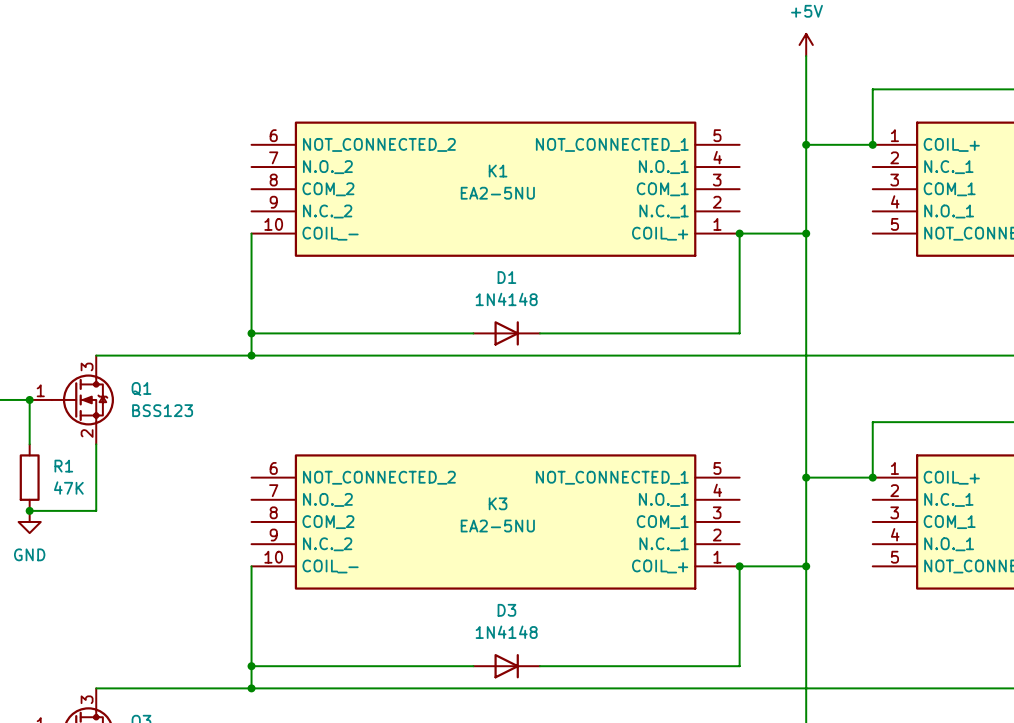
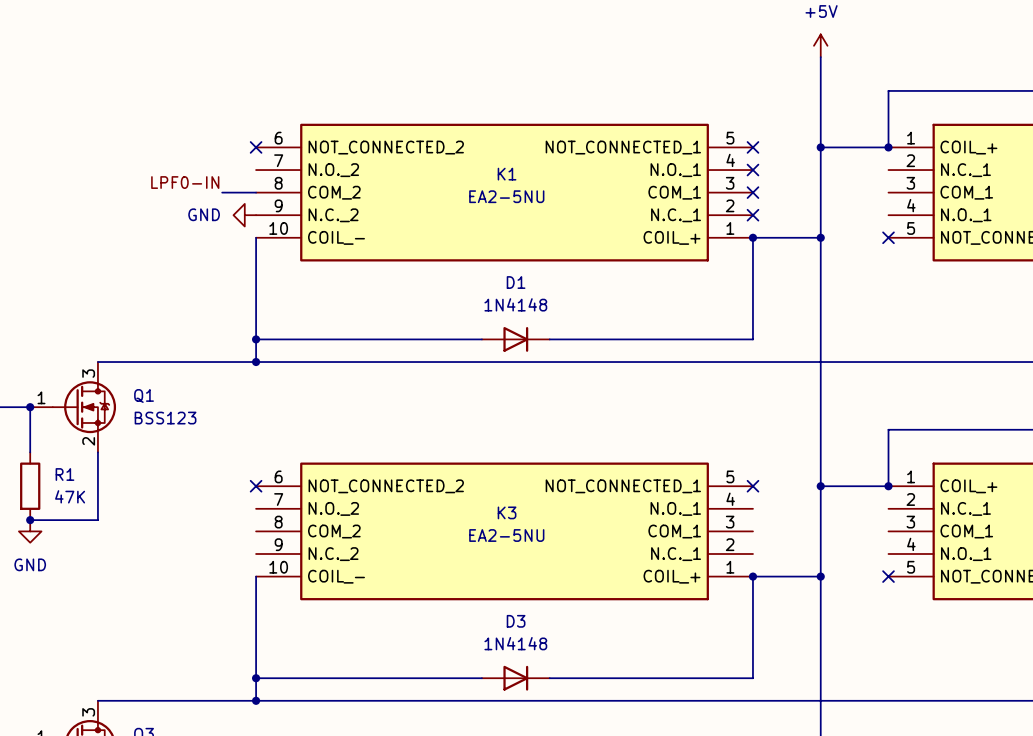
no-connect mark: none -> (256, 147)
no-connect mark: none -> (752, 147)
no-connect mark: none -> (752, 170)
label: none -> LPF0-IN (185, 182)
wire: none -> (222, 192) (256, 192)
no-connect mark: none -> (752, 192)
power symbol: none -> GND (244, 215)
no-connect mark: none -> (752, 215)
no-connect mark: none -> (888, 237)
no-connect mark: none -> (256, 486)
no-connect mark: none -> (752, 486)
no-connect mark: none -> (888, 576)

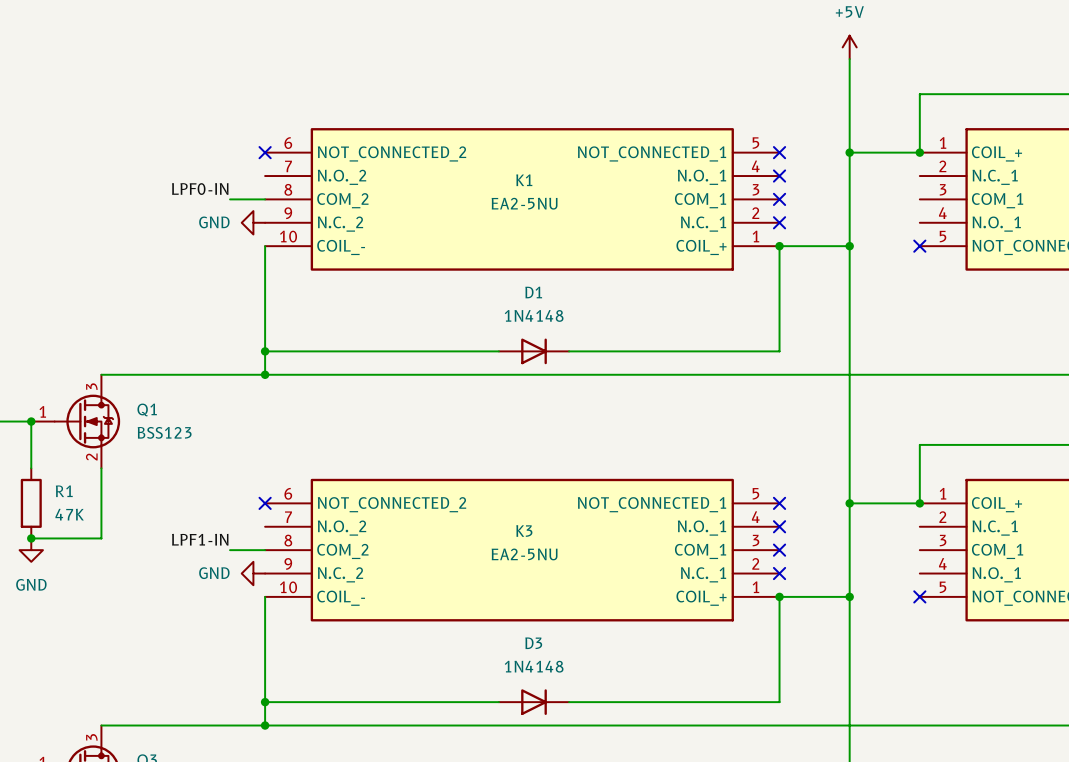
no-connect mark: none -> (779, 526)
label: none -> LPF1-IN (200, 539)
wire: none -> (230, 550) (265, 550)
no-connect mark: none -> (779, 550)
power symbol: none -> GND (253, 573)
no-connect mark: none -> (779, 573)

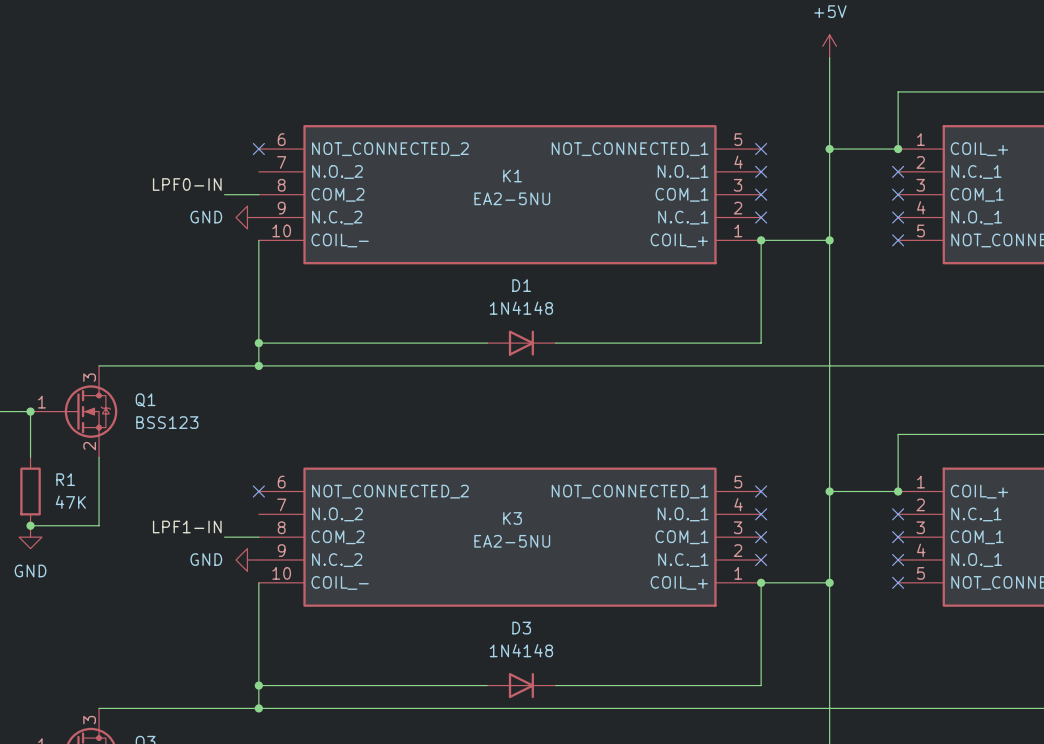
no-connect mark: none -> (898, 171)
no-connect mark: none -> (898, 194)
no-connect mark: none -> (898, 217)
no-connect mark: none -> (898, 514)
no-connect mark: none -> (898, 537)
no-connect mark: none -> (898, 559)

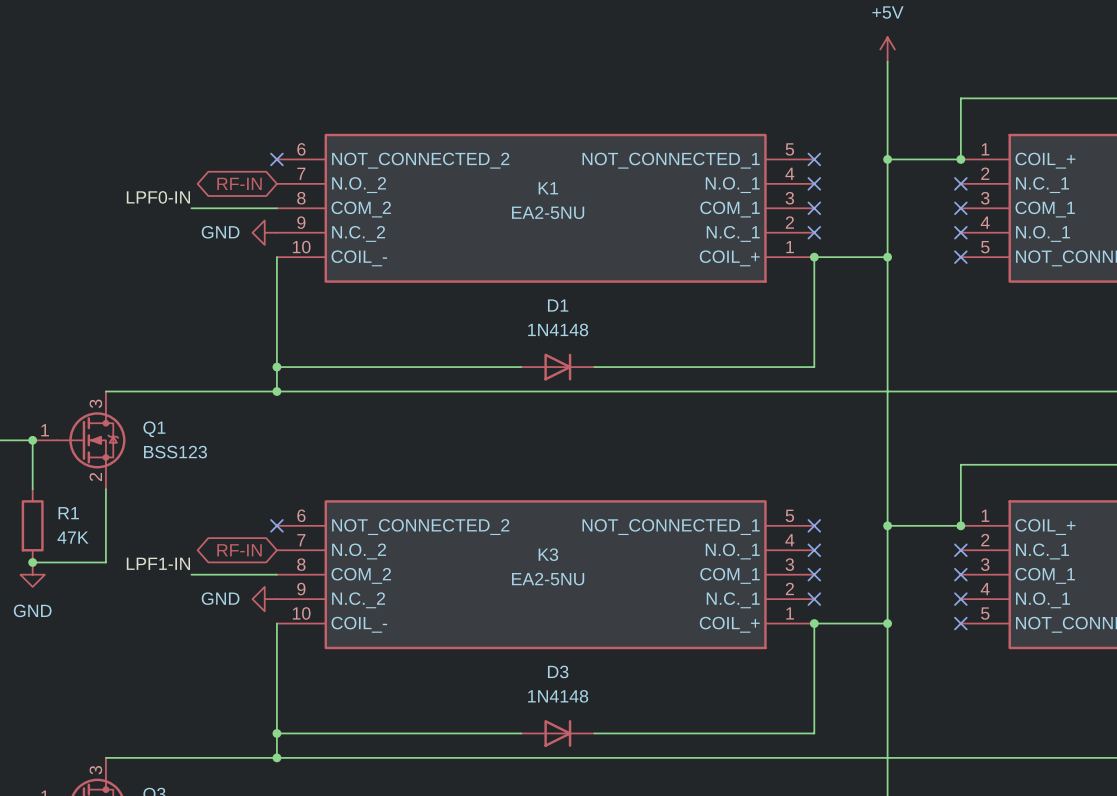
global label: none -> RF-IN (239, 183)
label position: LPF0-IN (187, 184) -> LPF0-IN (158, 197)
wire: none -> (191, 208) (240, 208)
global label: none -> RF-IN (239, 550)
label position: LPF1-IN (187, 526) -> LPF1-IN (158, 563)
wire: none -> (191, 574) (240, 574)

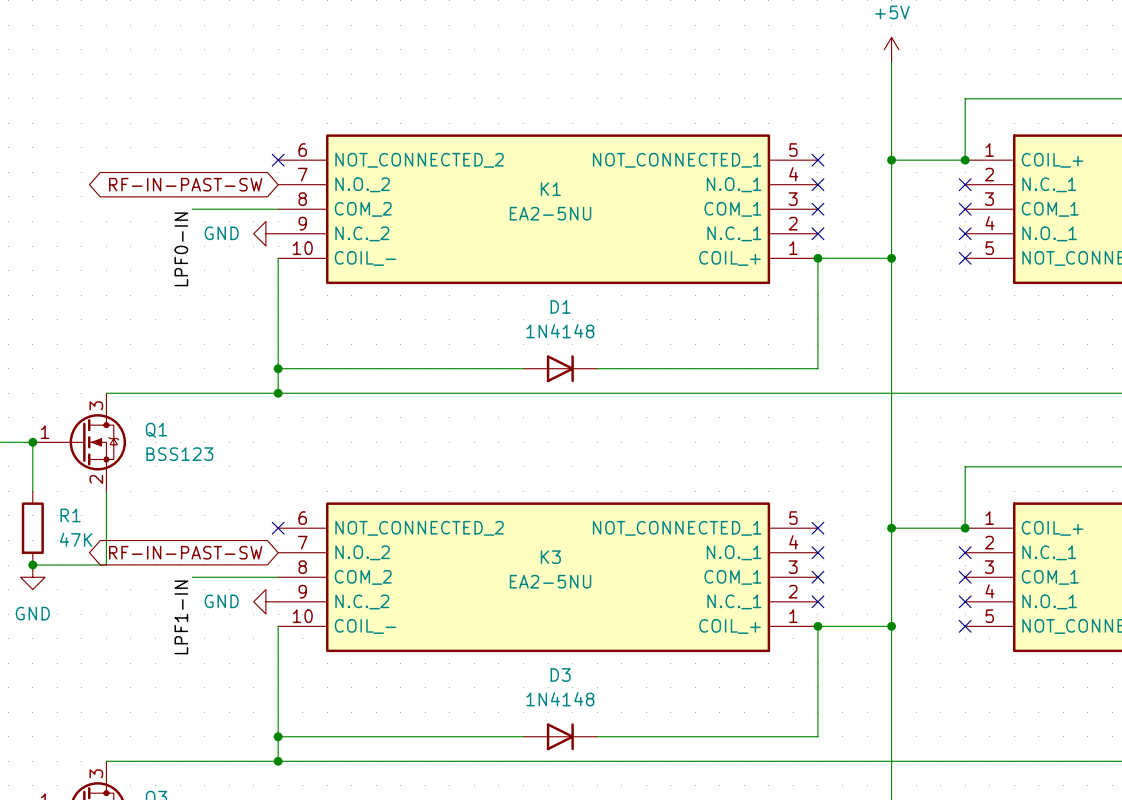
global label: RF-IN (239, 183) -> RF-IN-PAST-SW (185, 184)
label rotation: 0° (158, 197) -> 90° counterclockwise (181, 249)
global label: RF-IN (239, 550) -> RF-IN-PAST-SW (185, 552)
label rotation: 0° (158, 563) -> 90° counterclockwise (181, 617)

